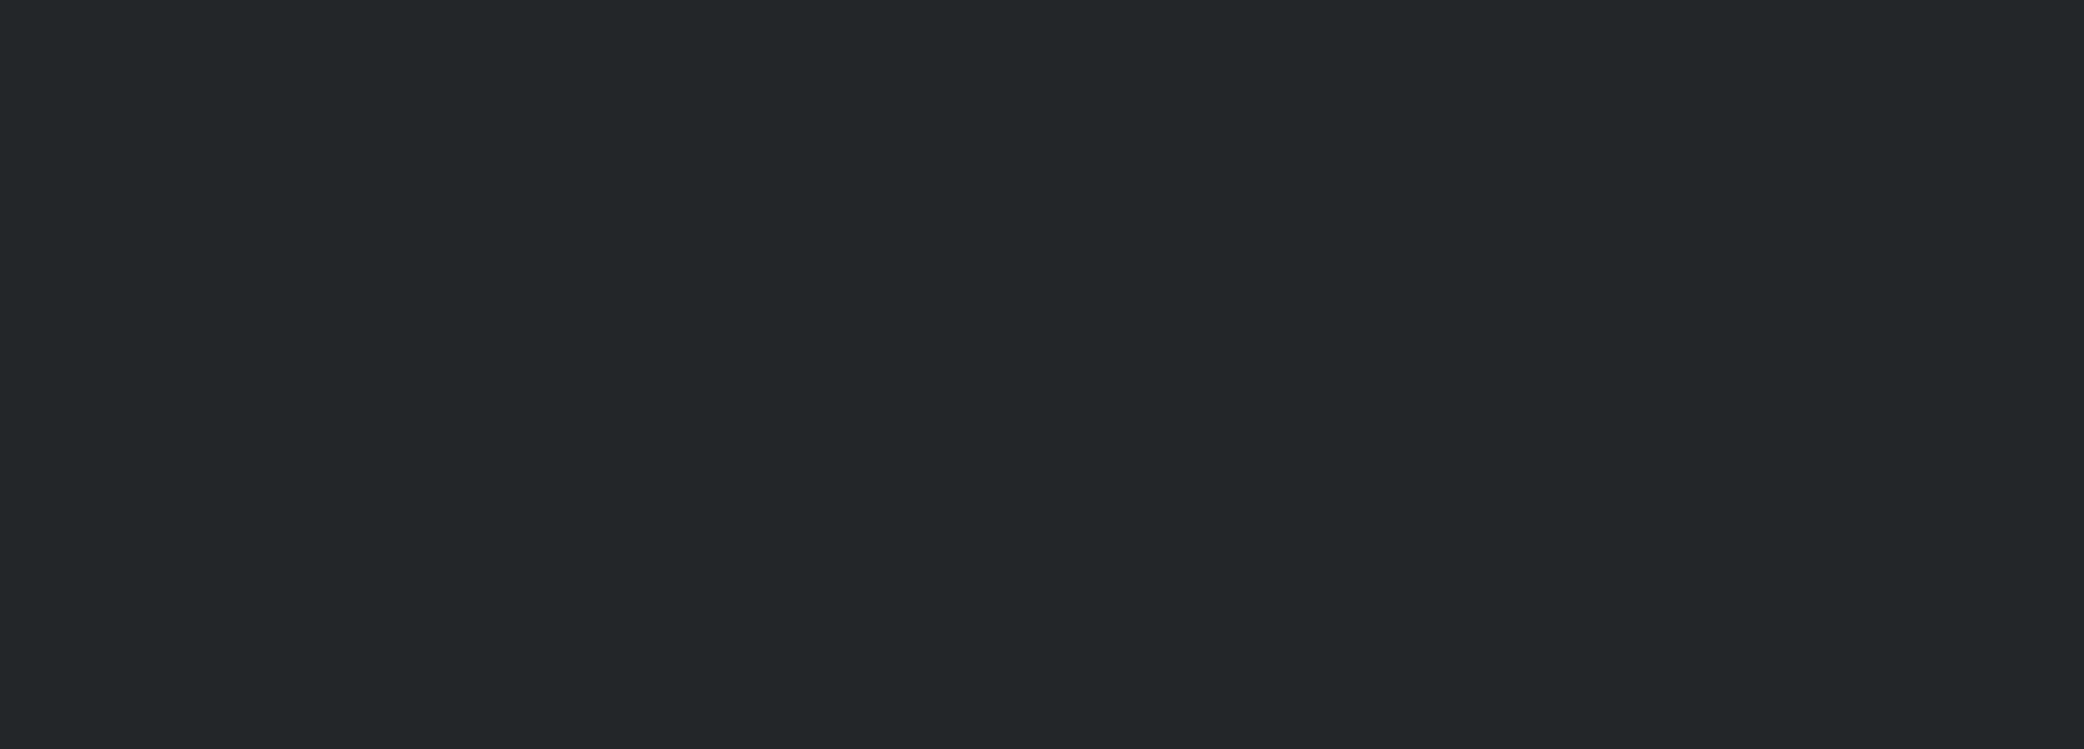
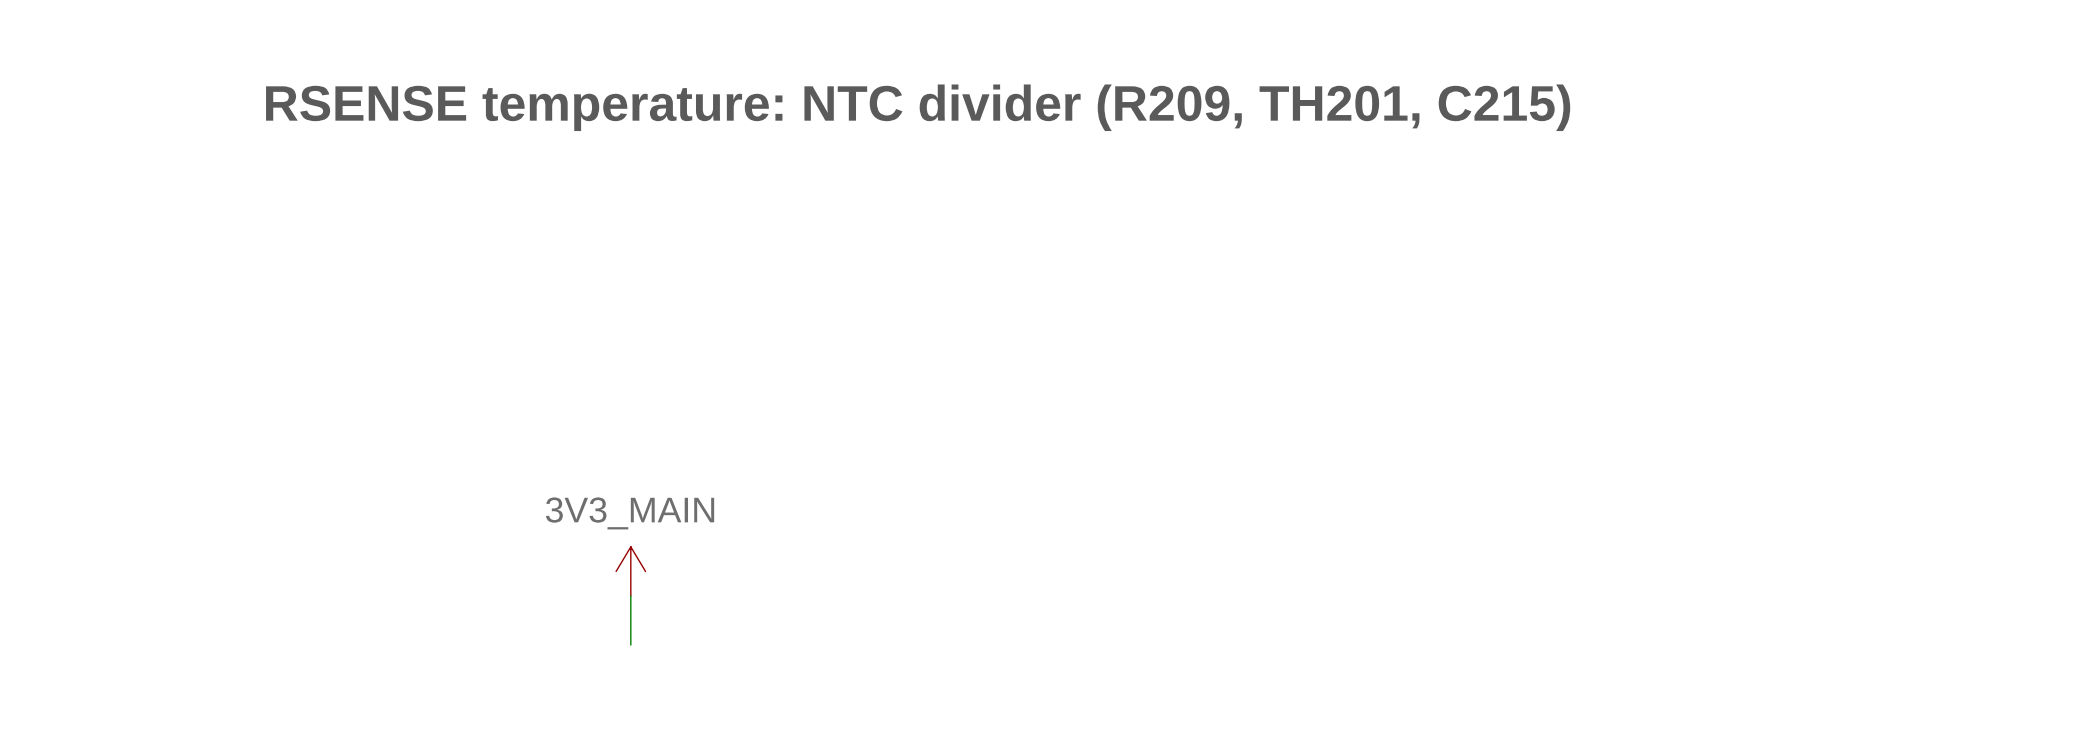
text: none -> RSENSE temperature: NTC divider (R209, TH201, C215) (918, 107)
power symbol: none -> 3V3_MAIN (630, 571)
wire: none -> (630, 596) (630, 645)

